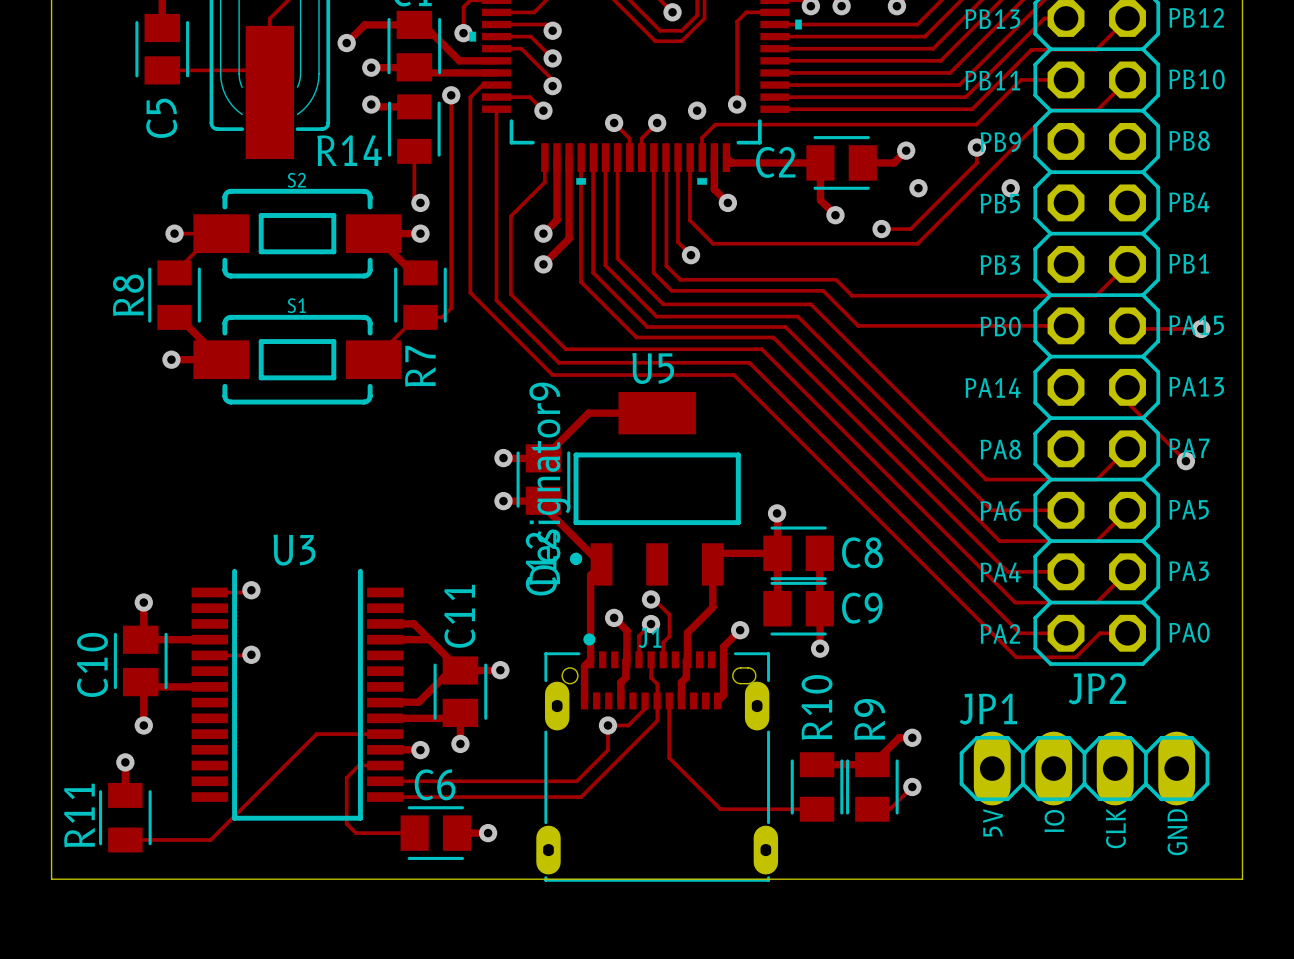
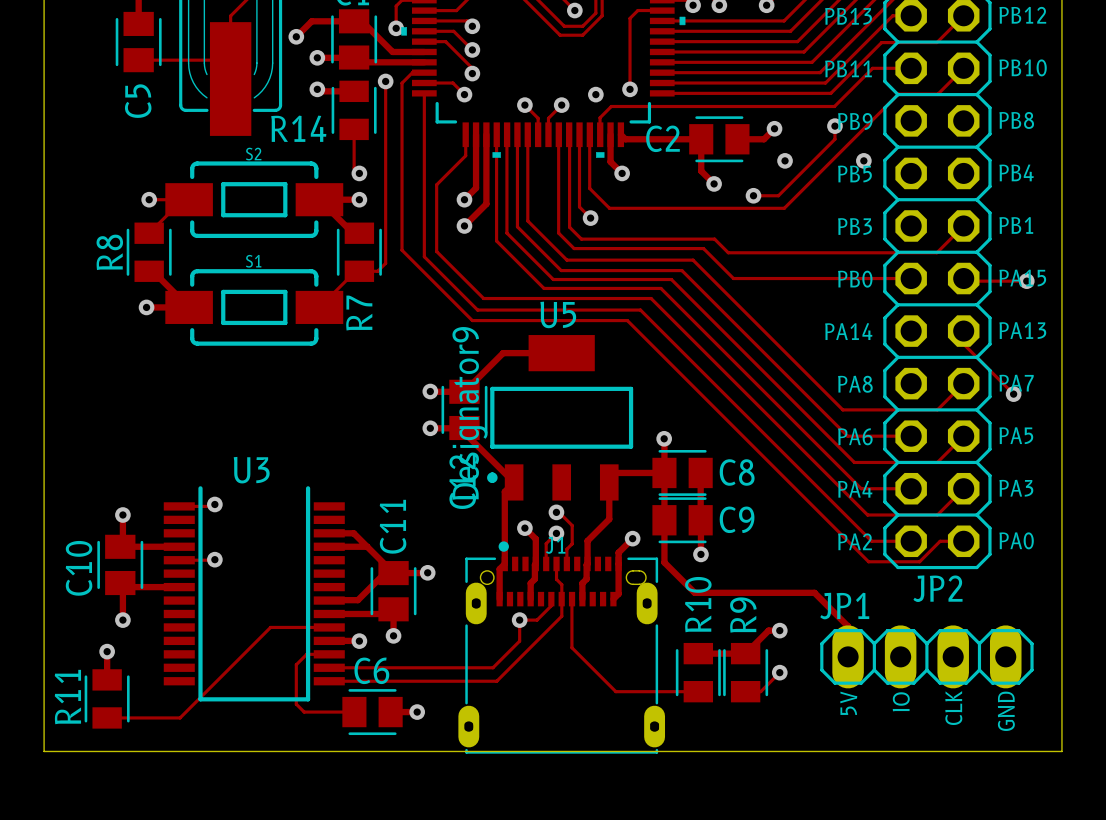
track: none -> (664, 520) (664, 562) (694, 592) (814, 592) (848, 626) (848, 656)

